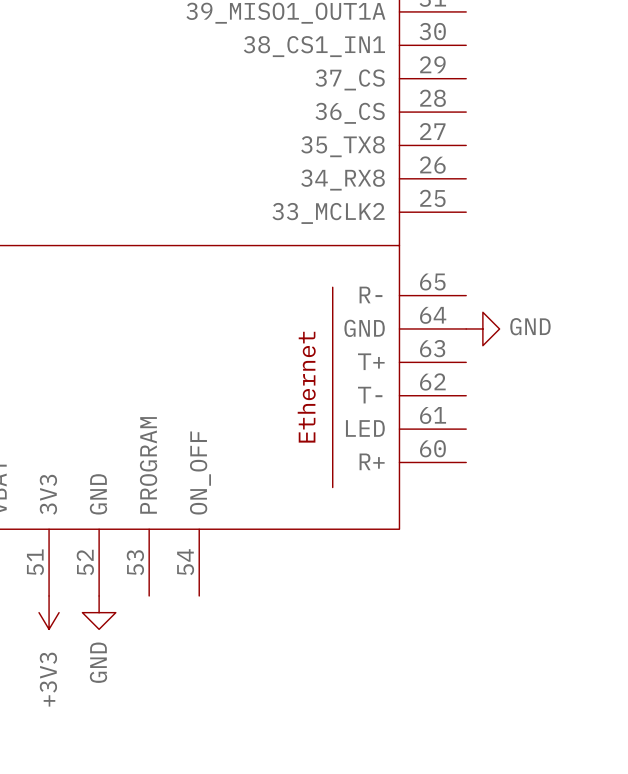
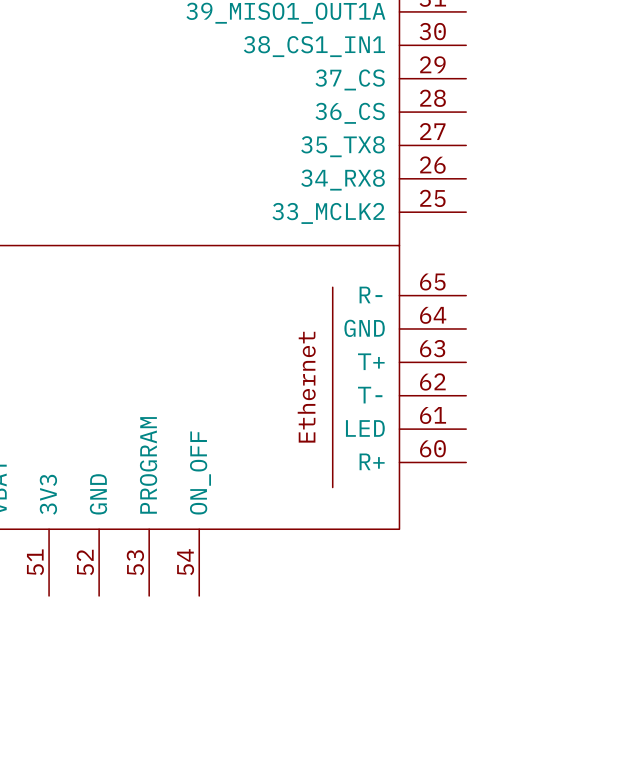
power symbol: GND (482, 328) -> none
power symbol: +3V3 (49, 612) -> none
power symbol: GND (99, 612) -> none

